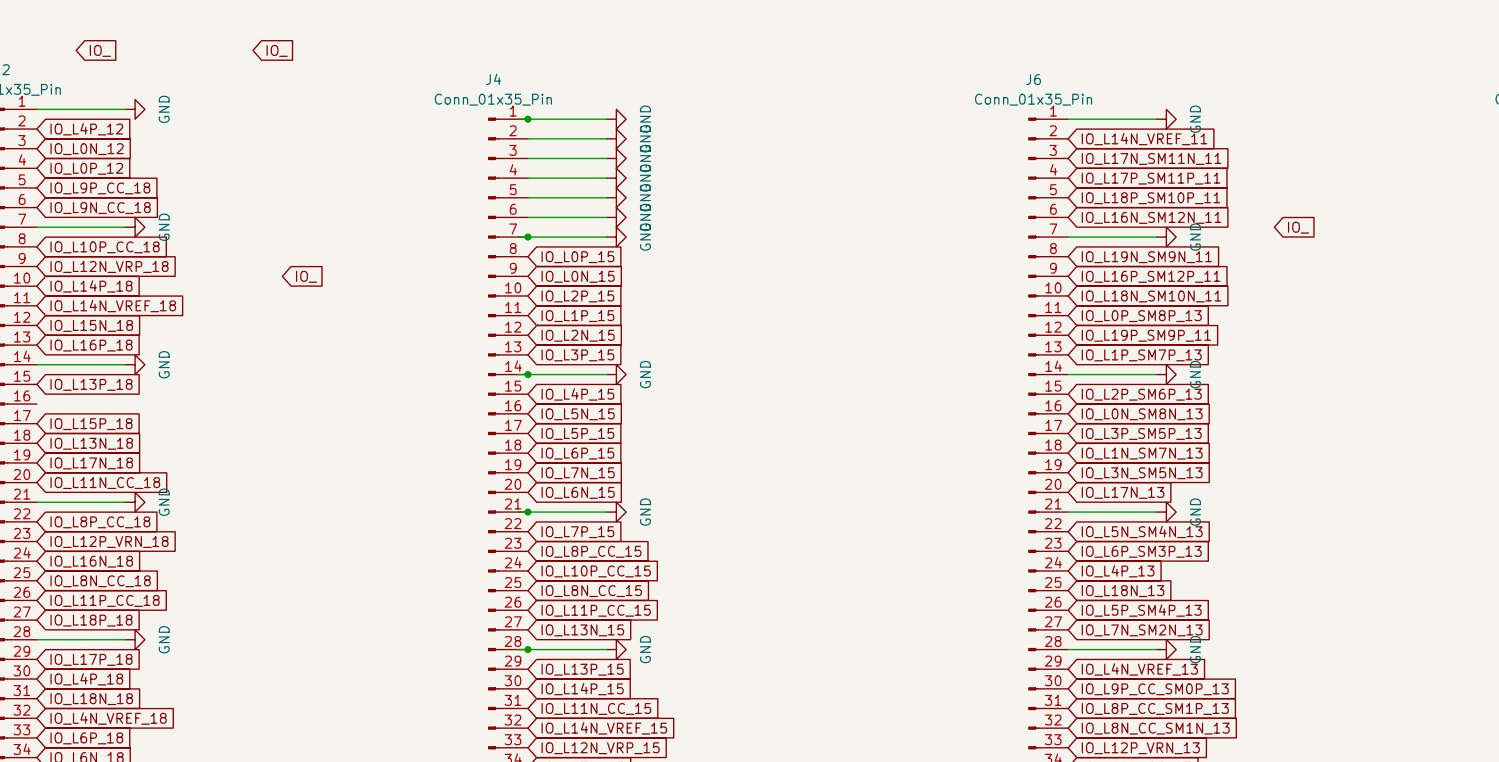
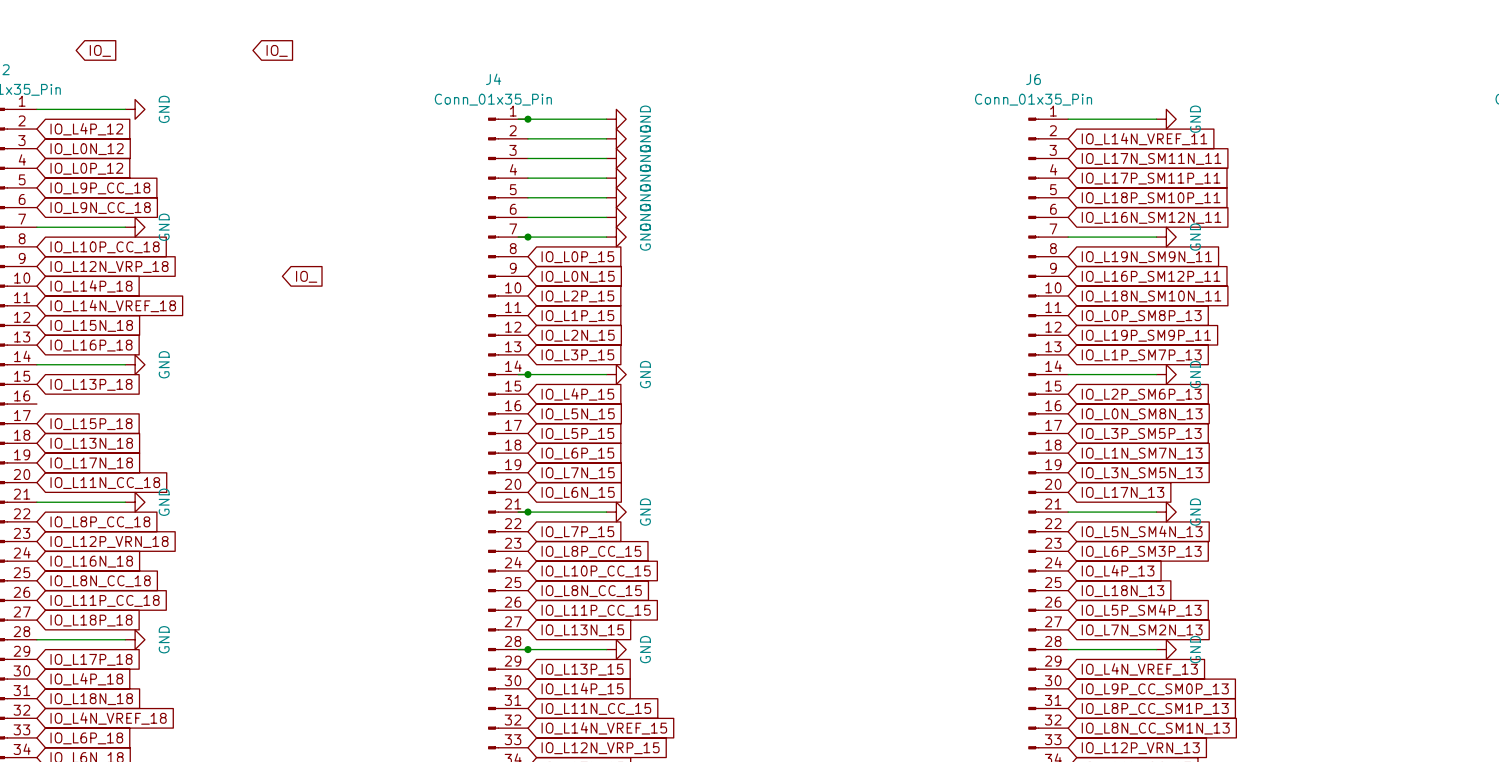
global label: IO_ (1298, 227) -> none

